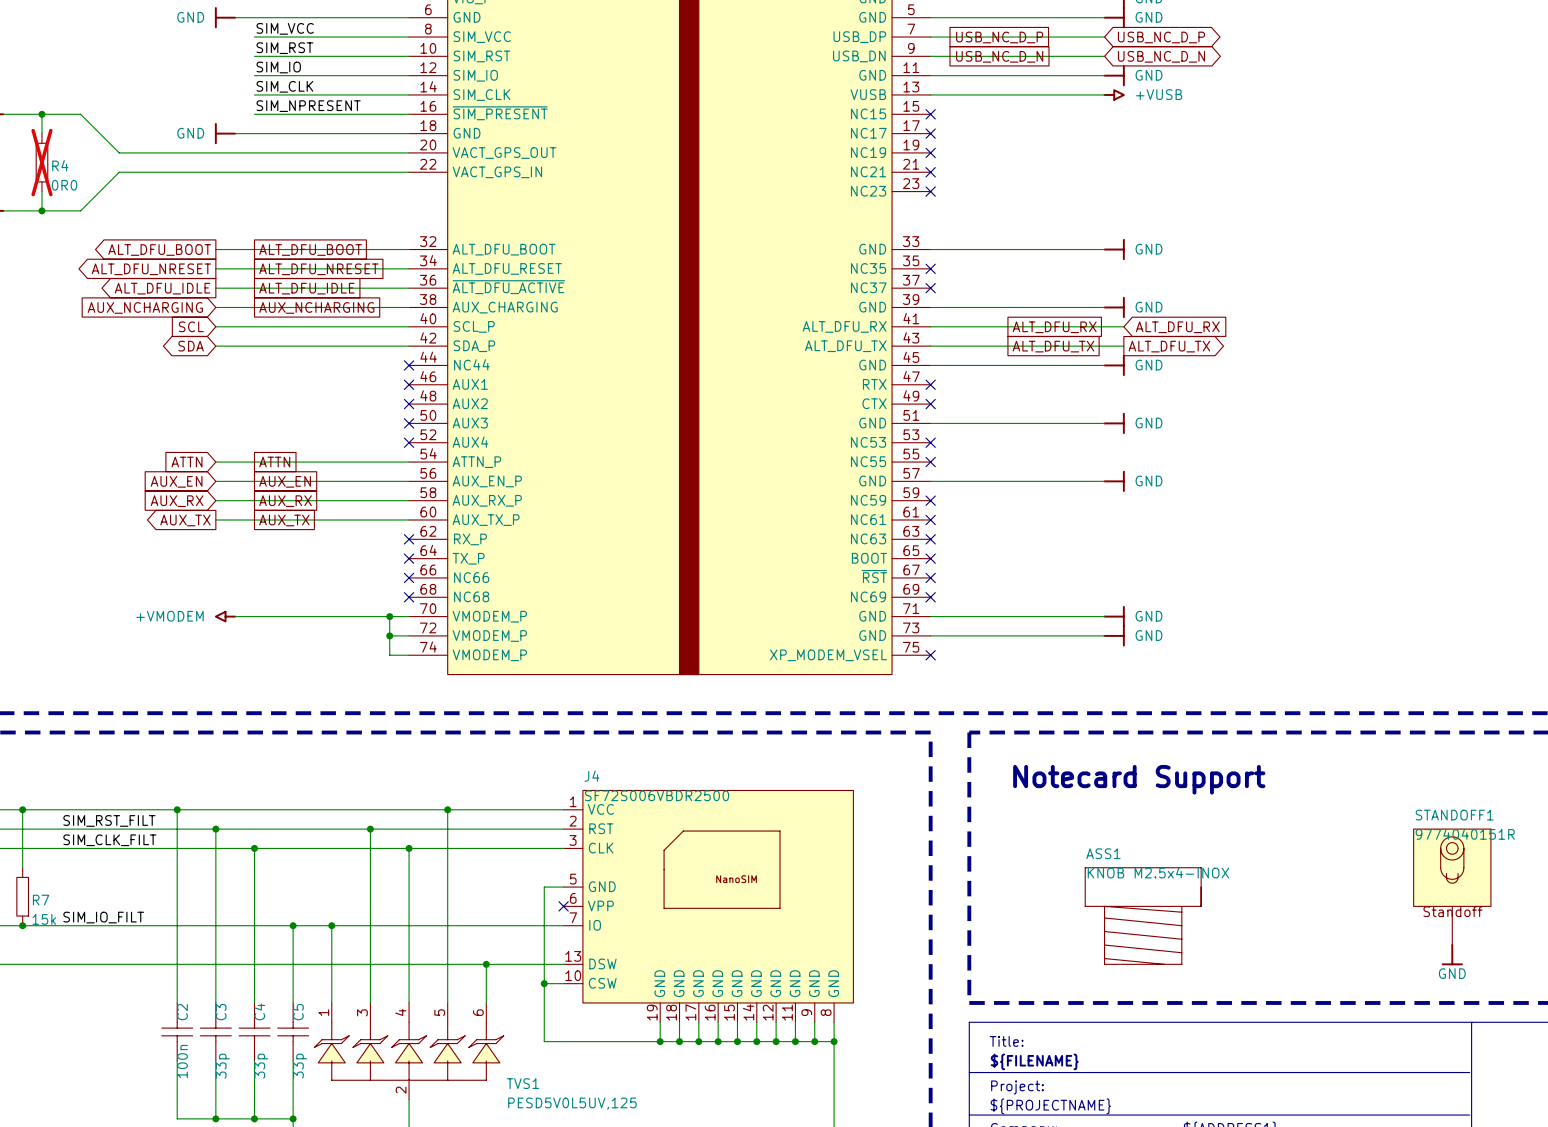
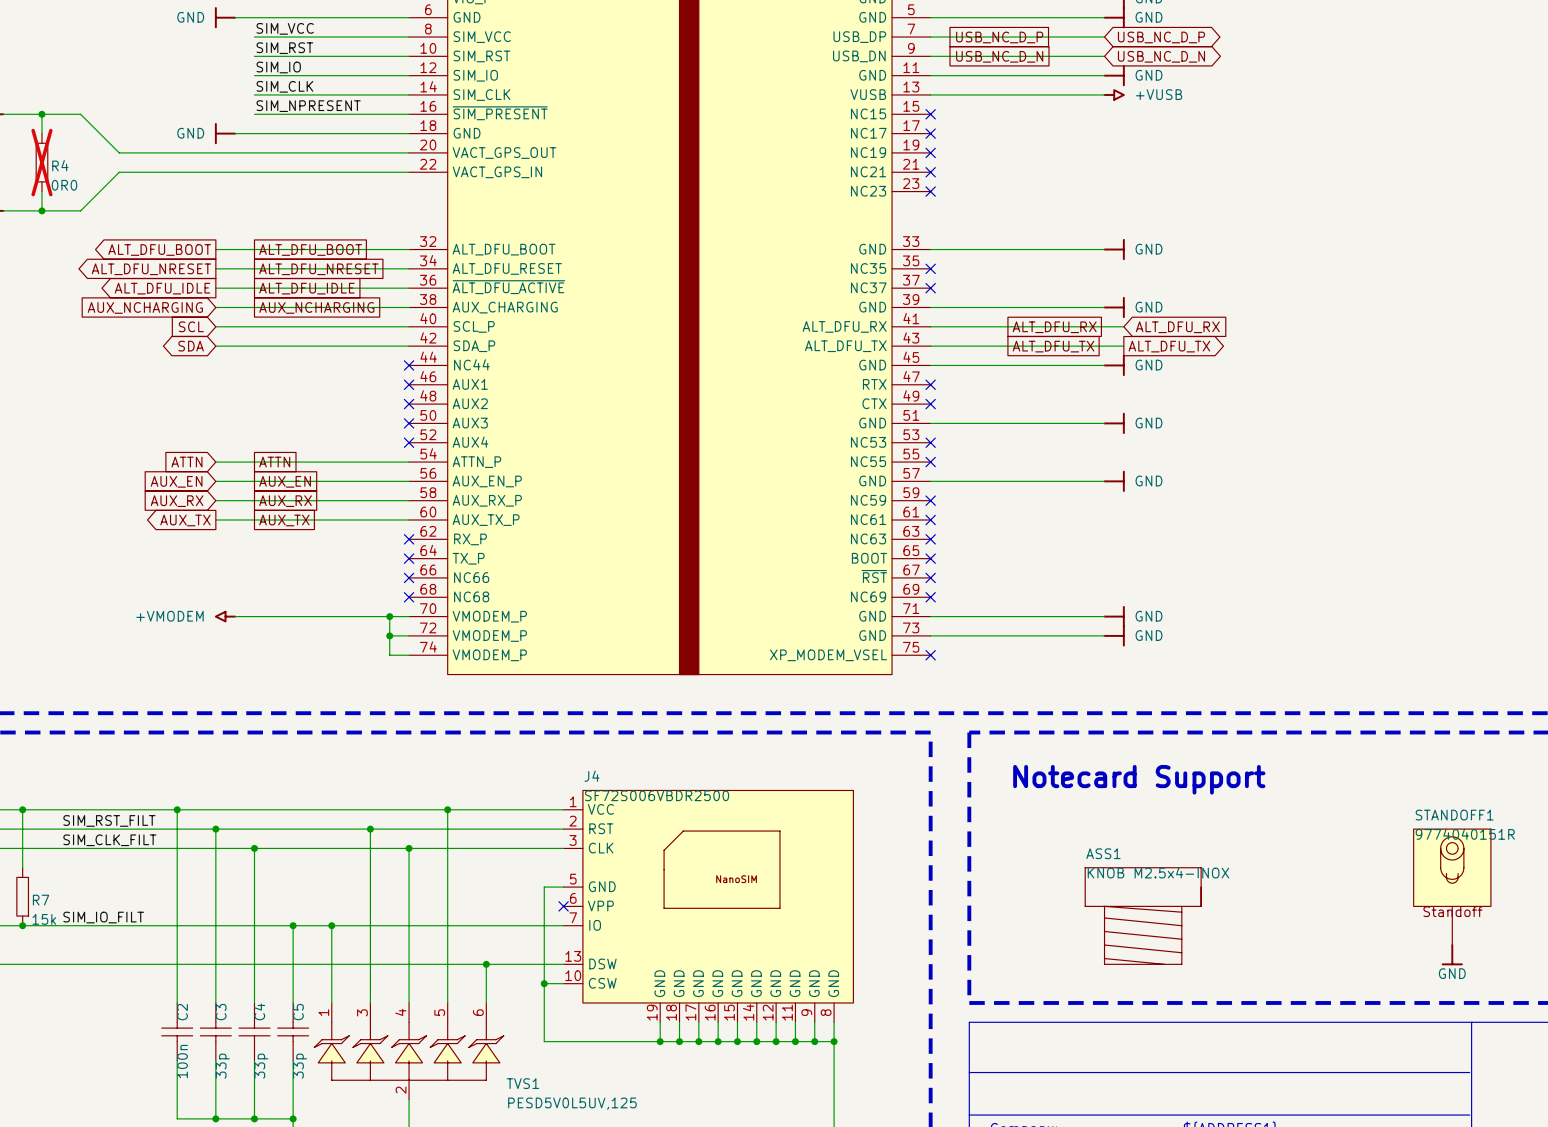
text: Title: (1006, 1041) -> none
text: ${FILENAME} (1034, 1061) -> none
text: Project: (1017, 1087) -> none
text: ${PROJECTNAME} (1050, 1106) -> none

